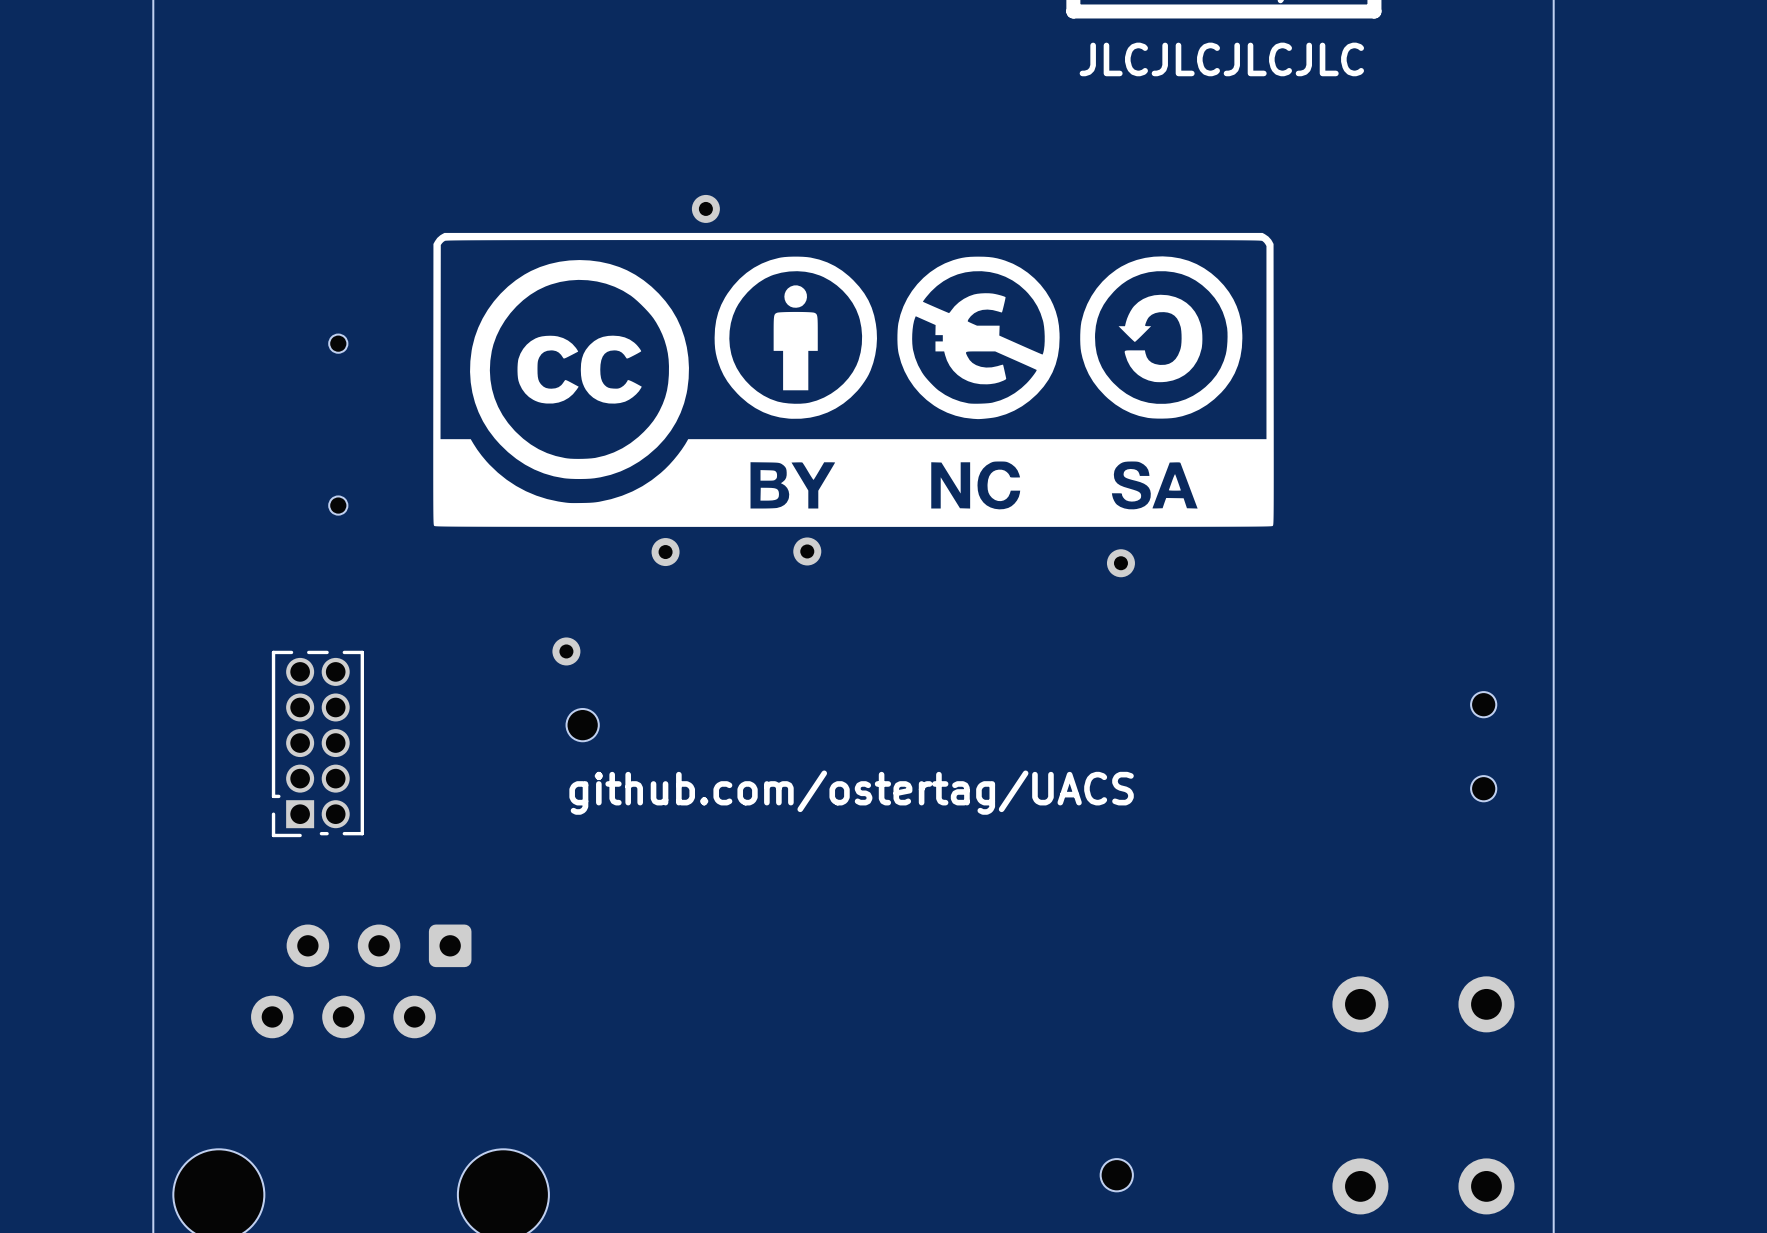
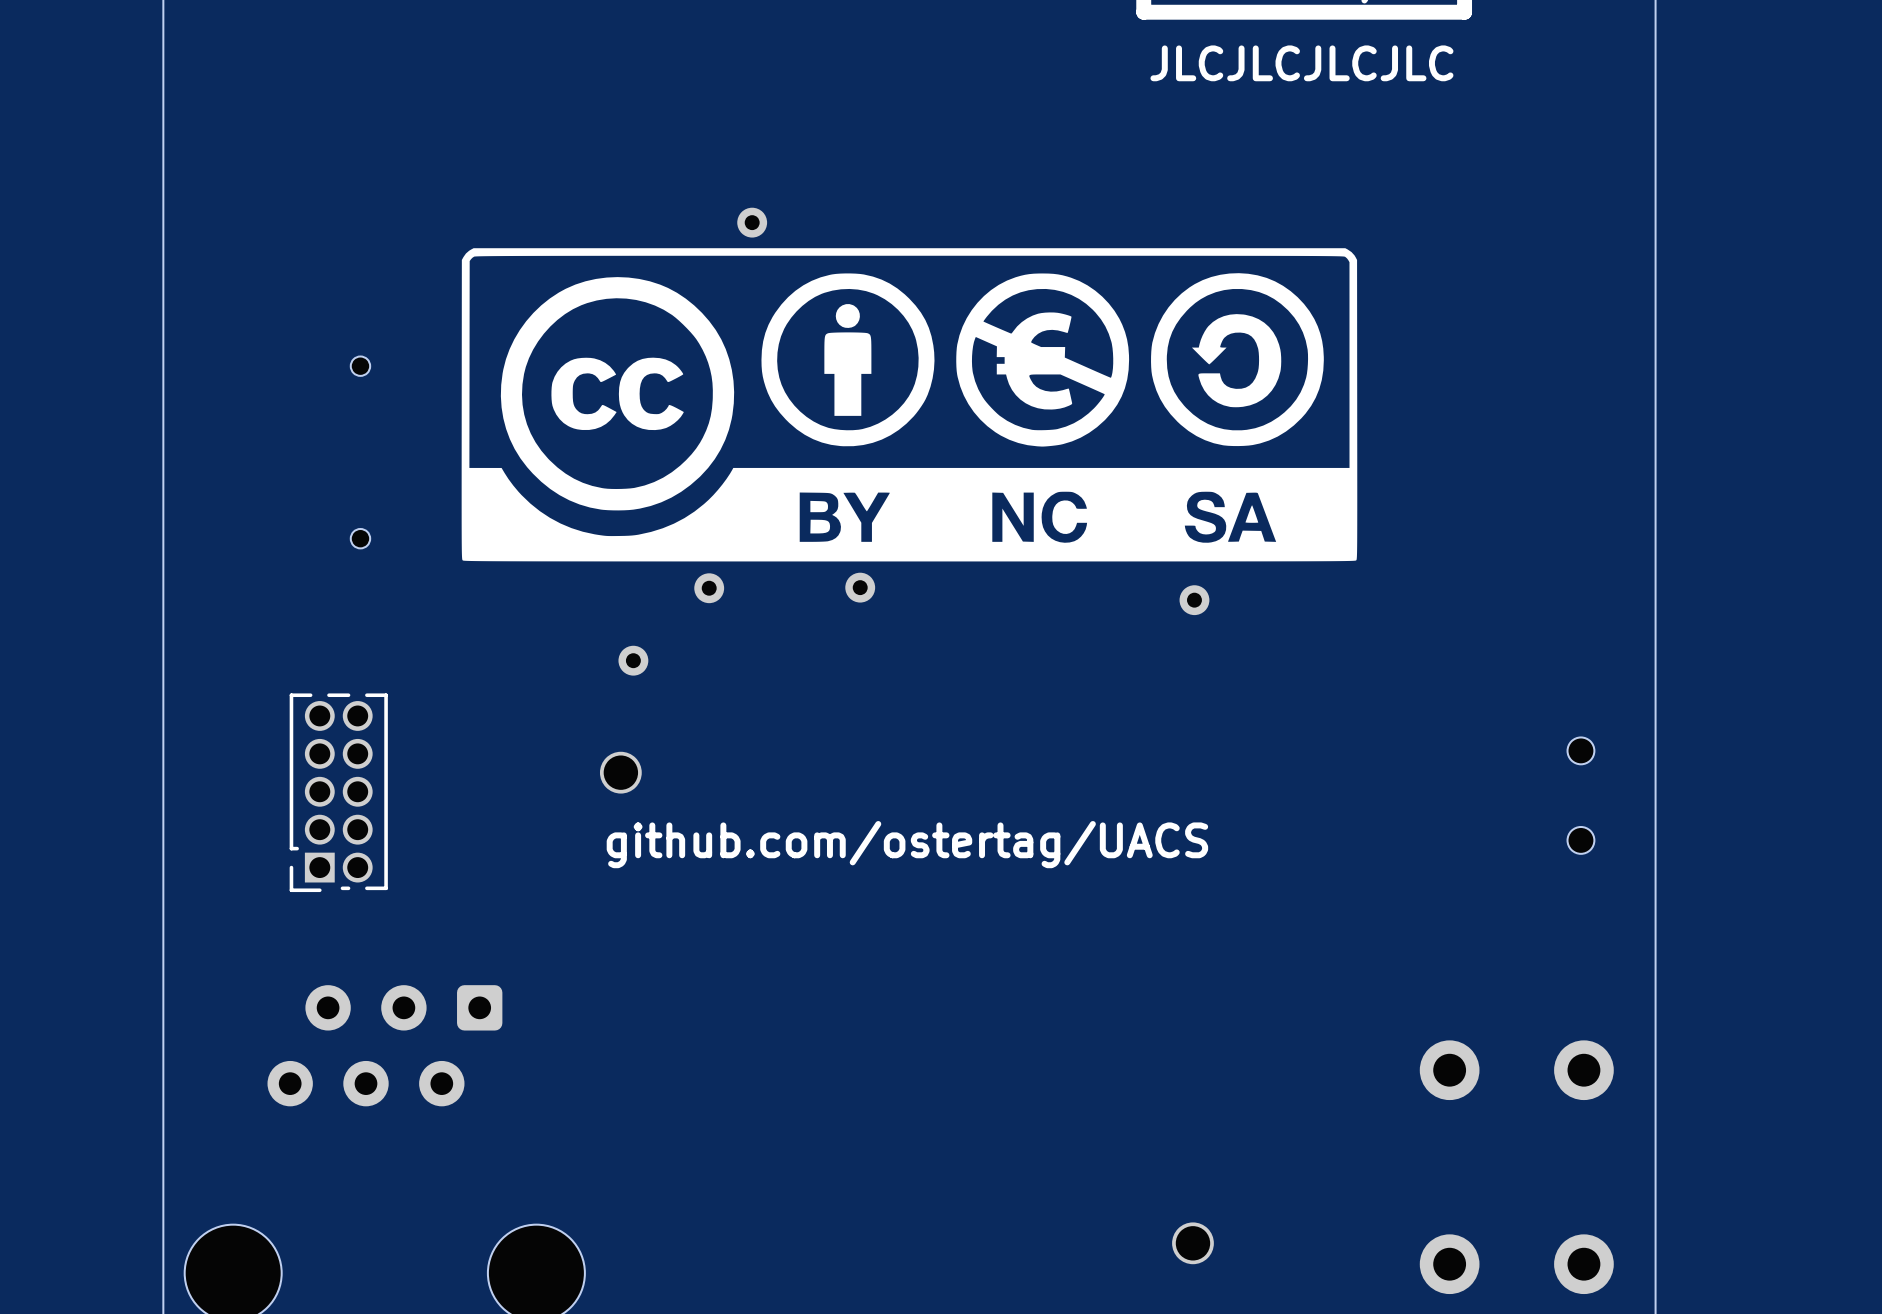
part position: (566, 651) -> (633, 660)
part footprint: [566, 708, 599, 742] -> [599, 751, 642, 794]
part footprint: [1100, 1159, 1133, 1192] -> [1172, 1222, 1214, 1265]

